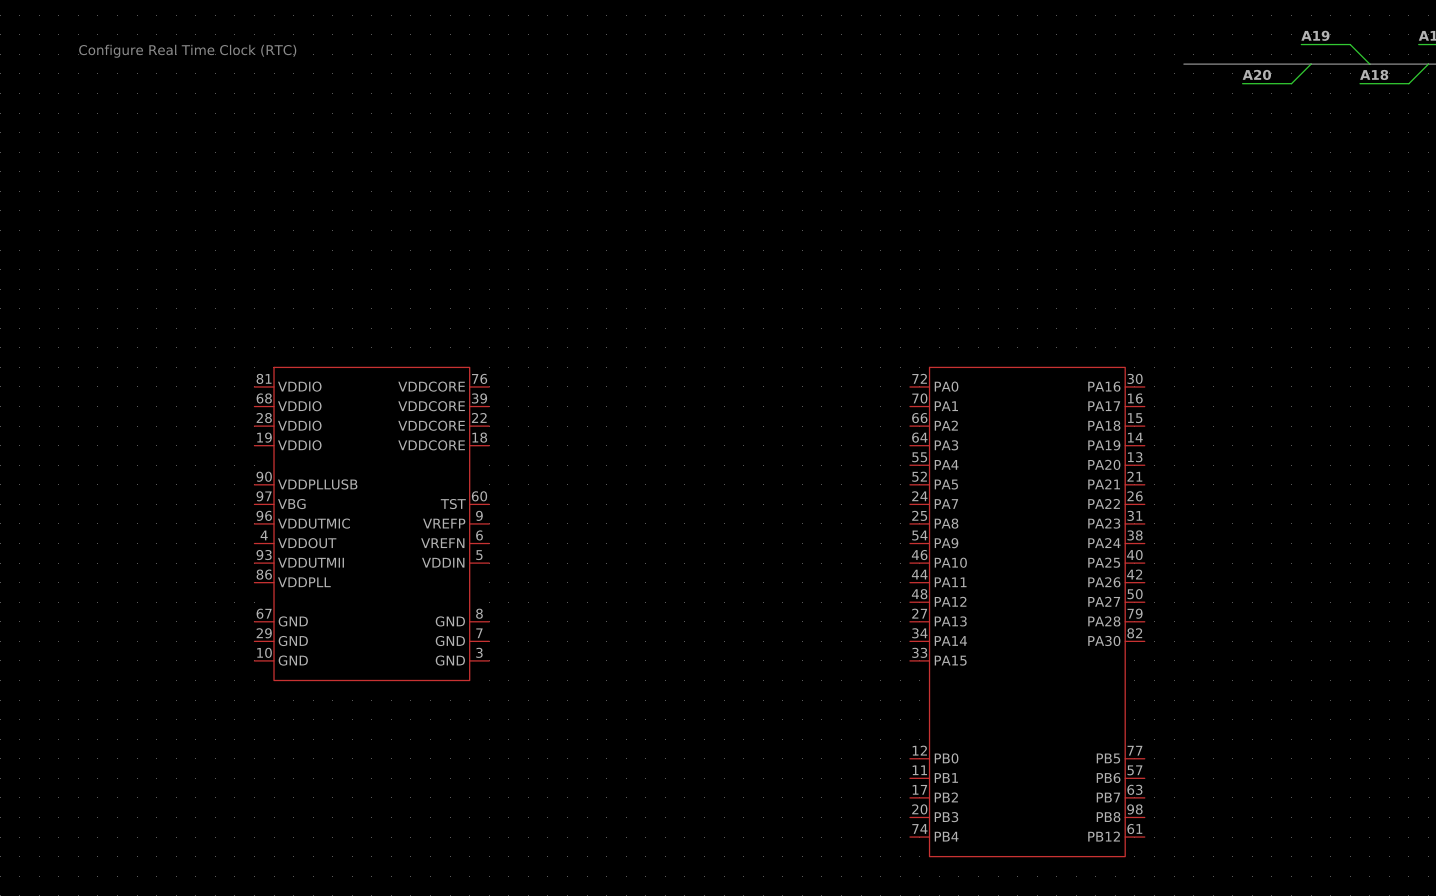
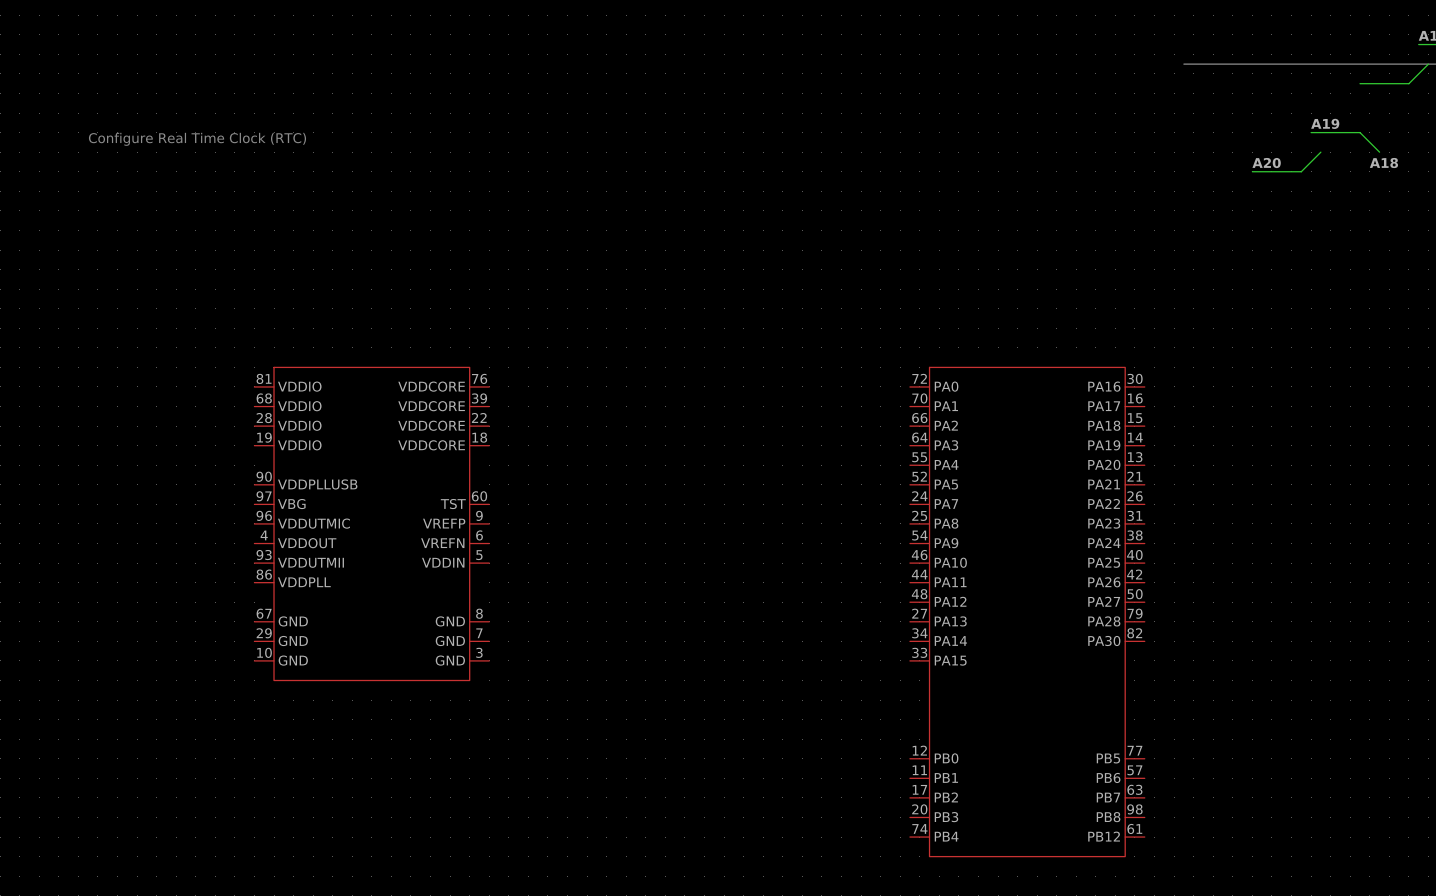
label position: A19 (1315, 35) -> A19 (1325, 123)
wire: (1301, 44) (1350, 44) (1369, 64) -> (1311, 132) (1360, 132) (1379, 152)
text position: Configure Real Time Clock (RTC) (187, 51) -> Configure Real Time Clock (RTC) (197, 139)
wire: (1311, 64) (1291, 83) (1242, 83) -> (1320, 152) (1301, 171) (1252, 171)
label position: A20 (1256, 74) -> A20 (1266, 163)
label position: A18 (1374, 74) -> A18 (1383, 163)

